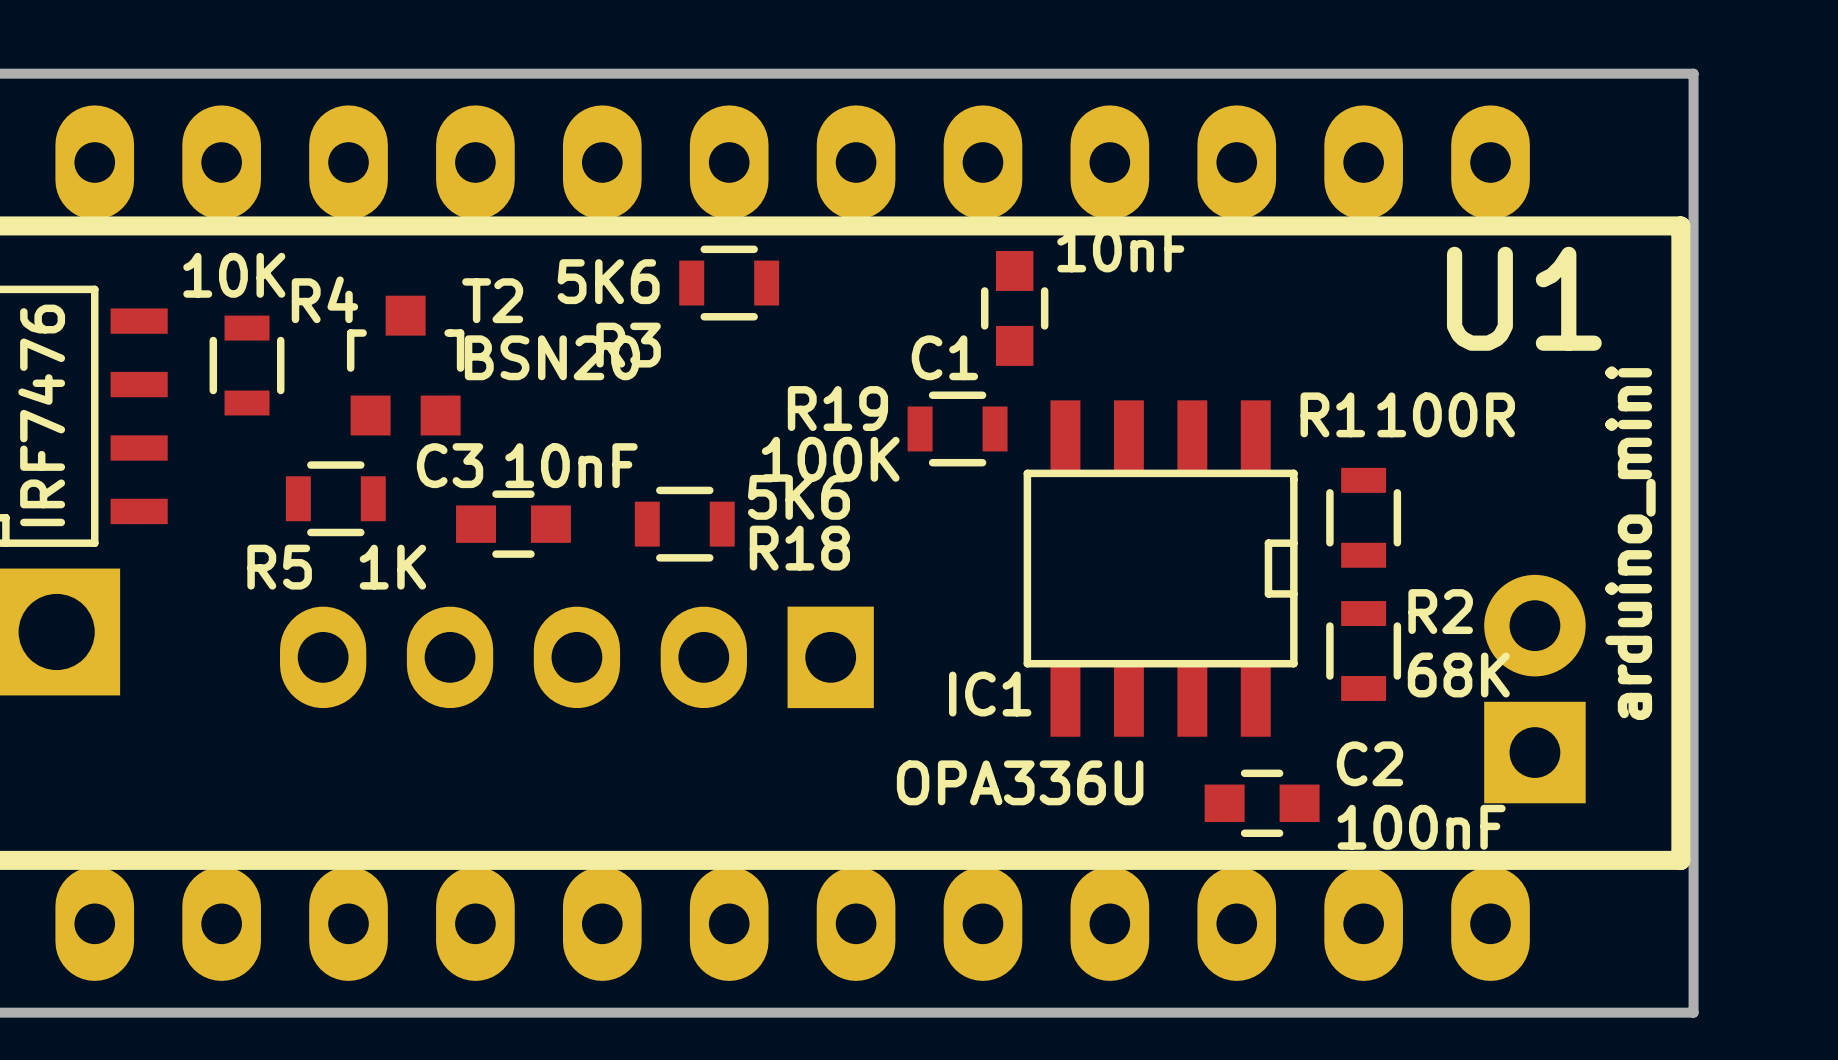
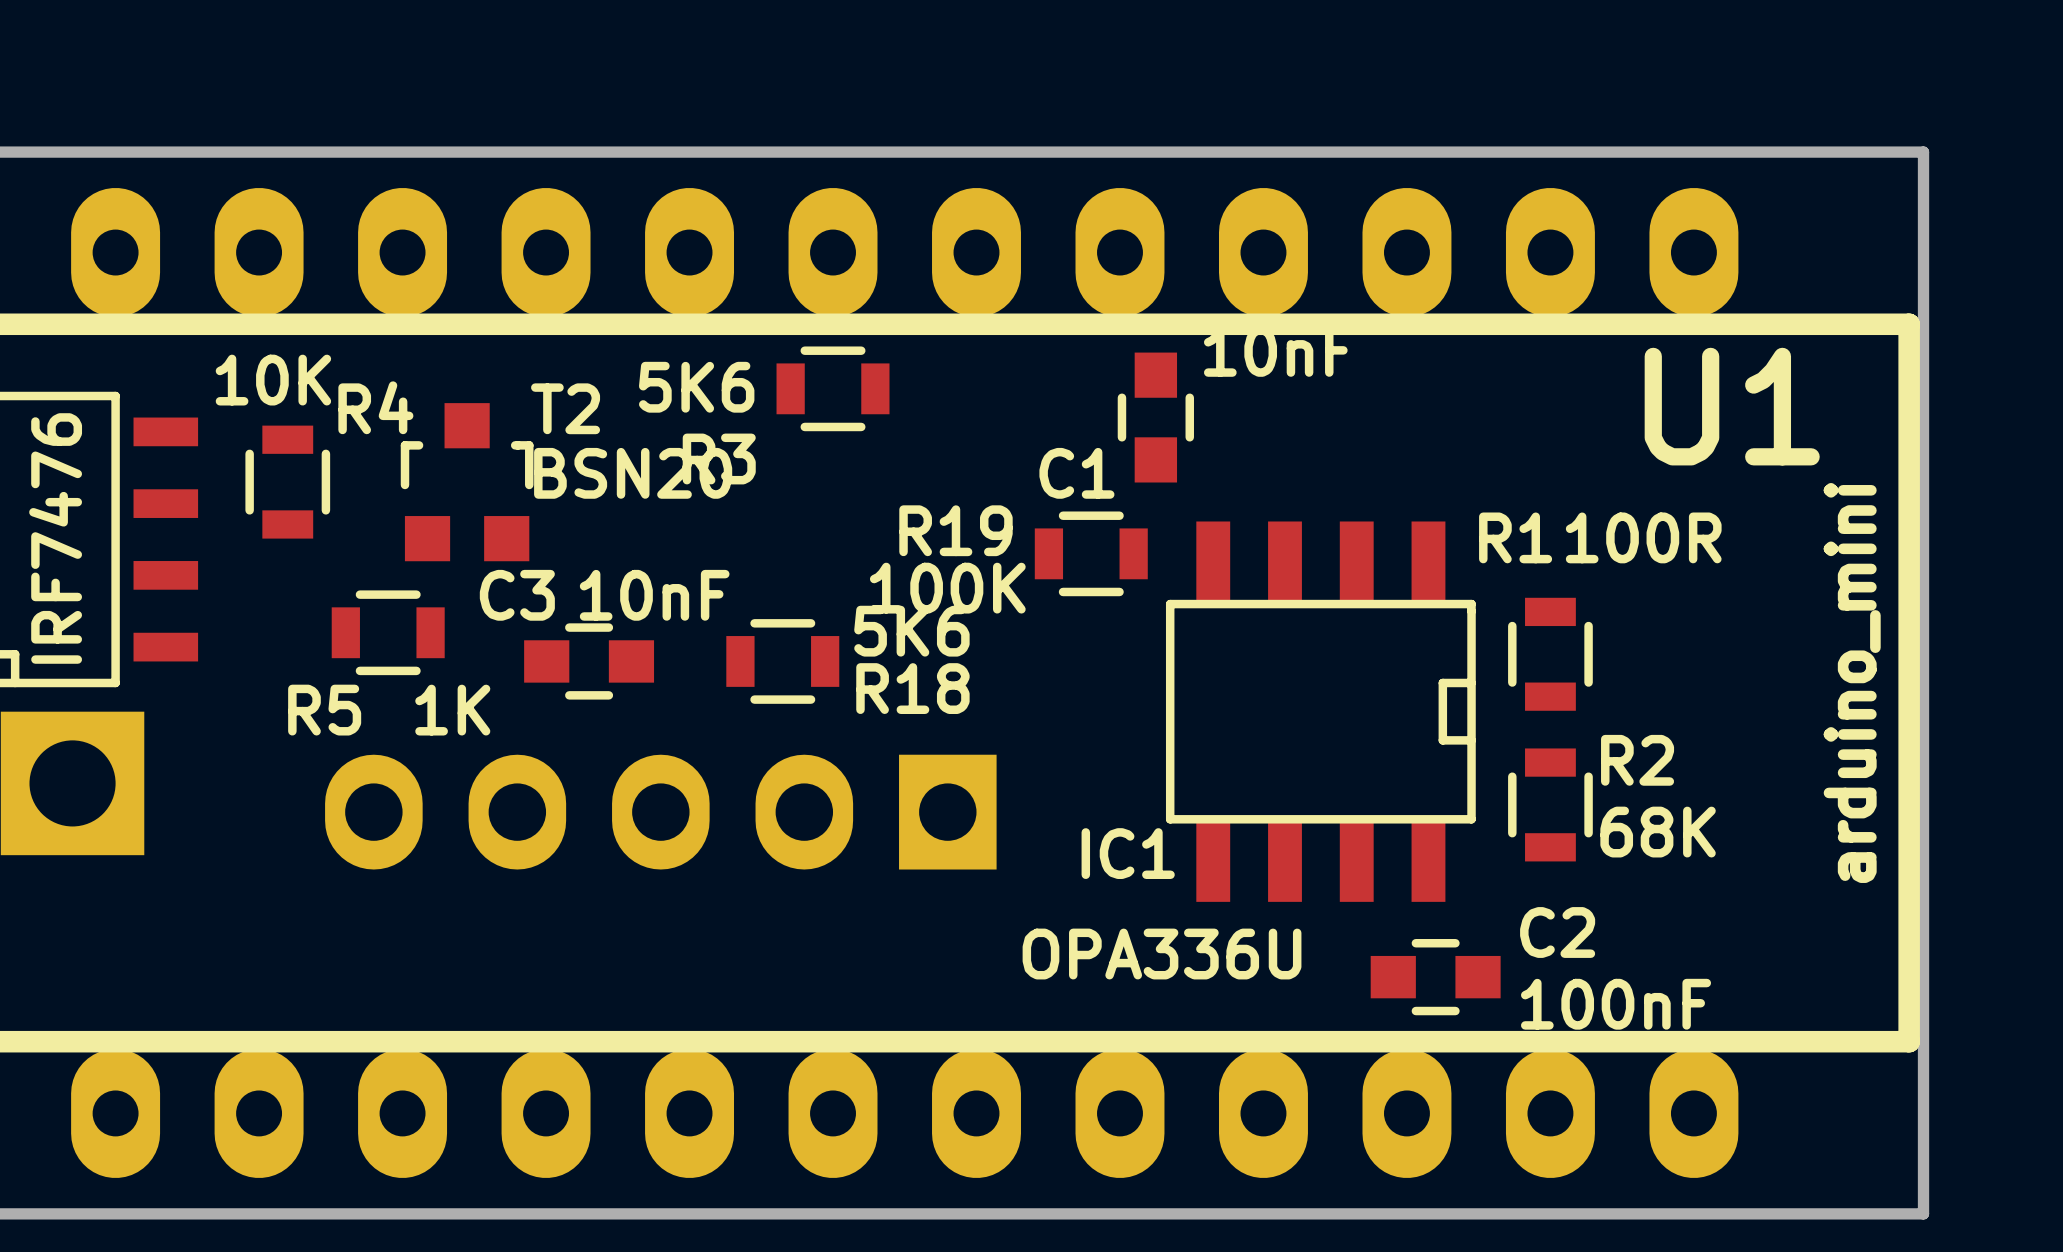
part: (1534, 689) -> none

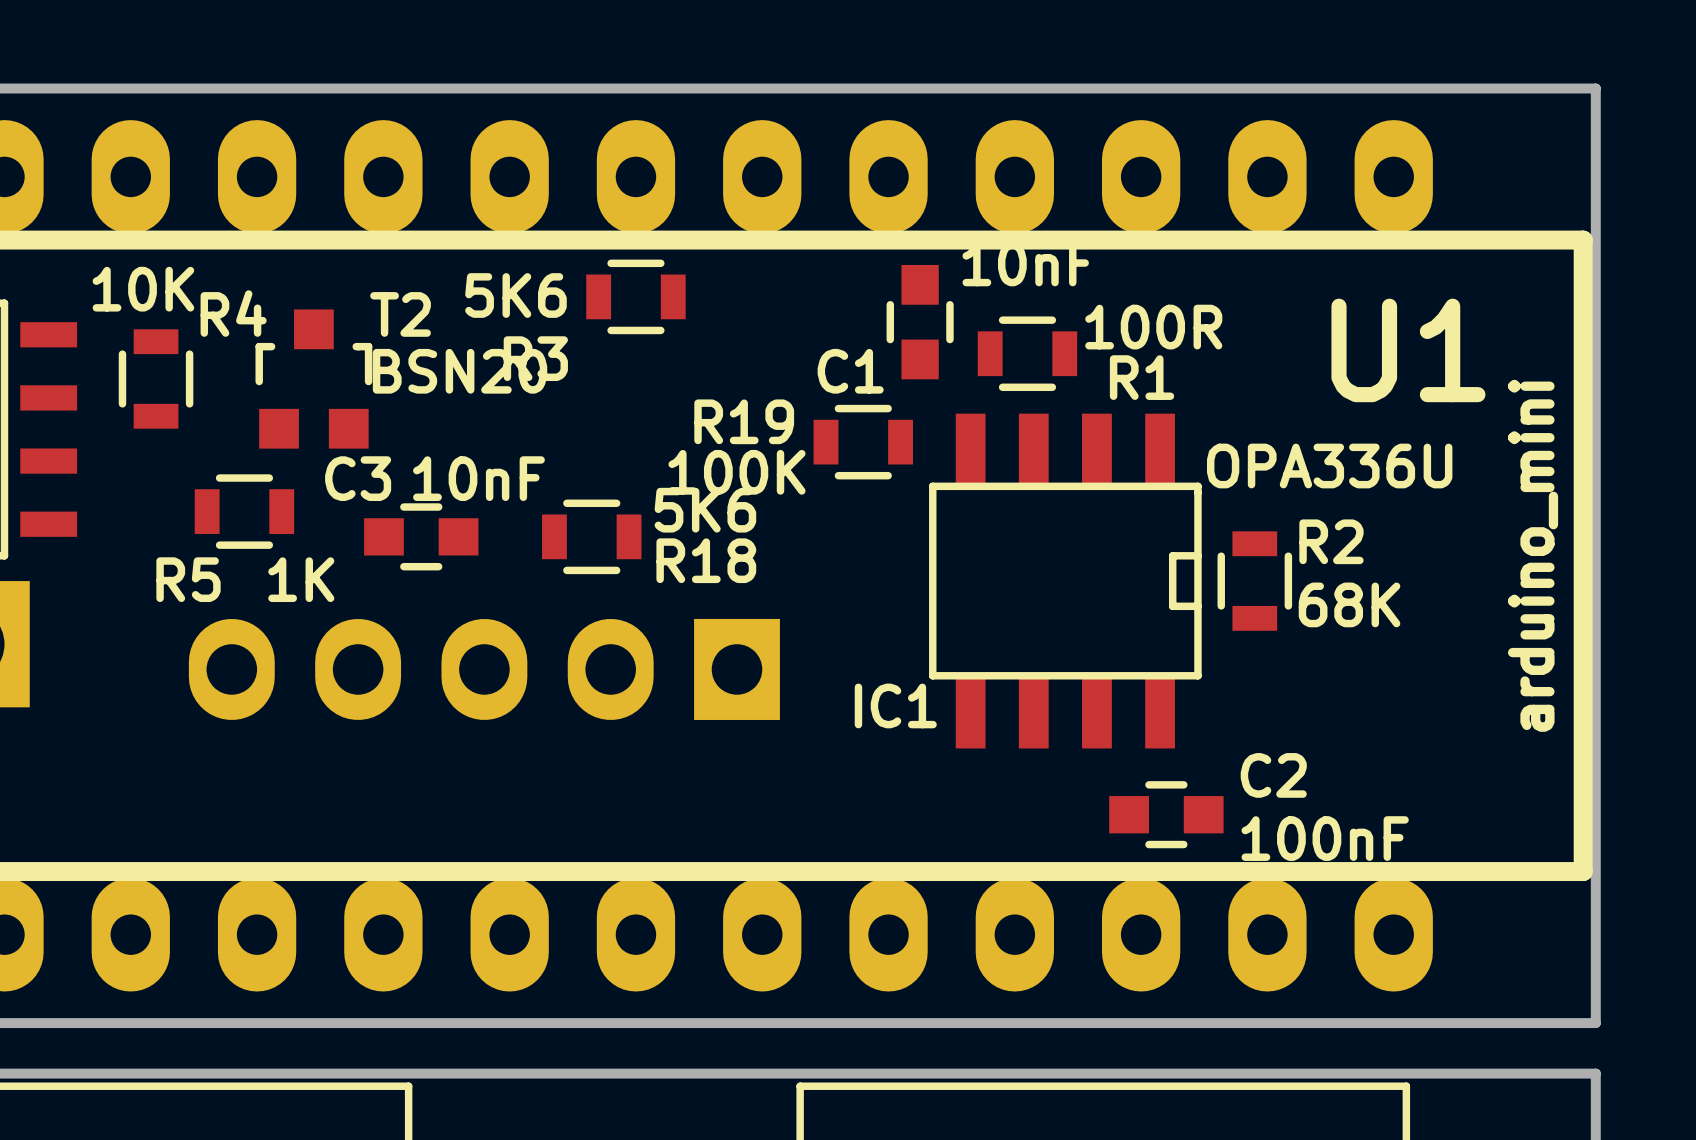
U1 name position: U1 (1732, 406) -> U1 (1408, 350)
R1 rotation: 0° (1550, 654) -> 90° clockwise (1027, 353)
R1 position: (1550, 654) -> (1027, 353)
R2 position: (1550, 804) -> (1254, 581)
IC1 value position: OPA336U (1162, 954) -> OPA336U (1329, 465)

